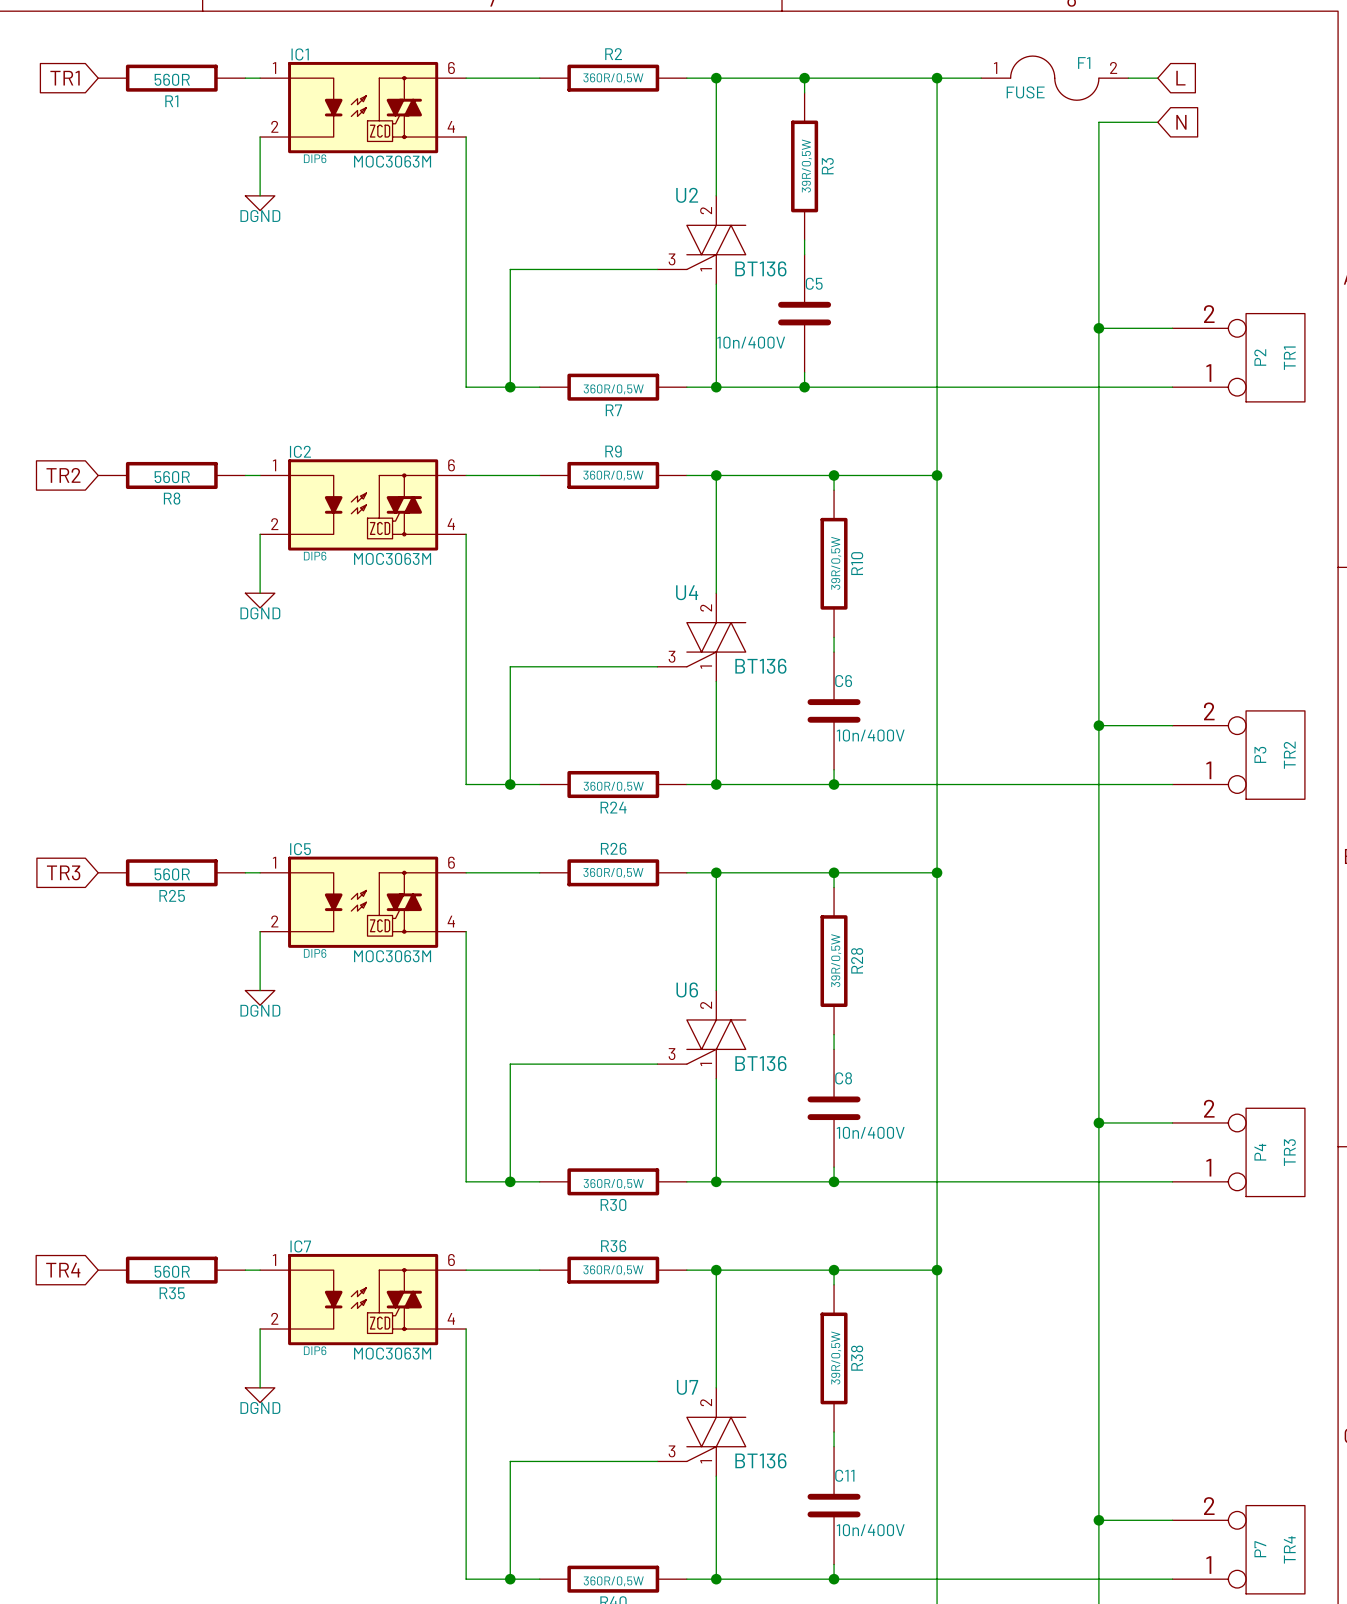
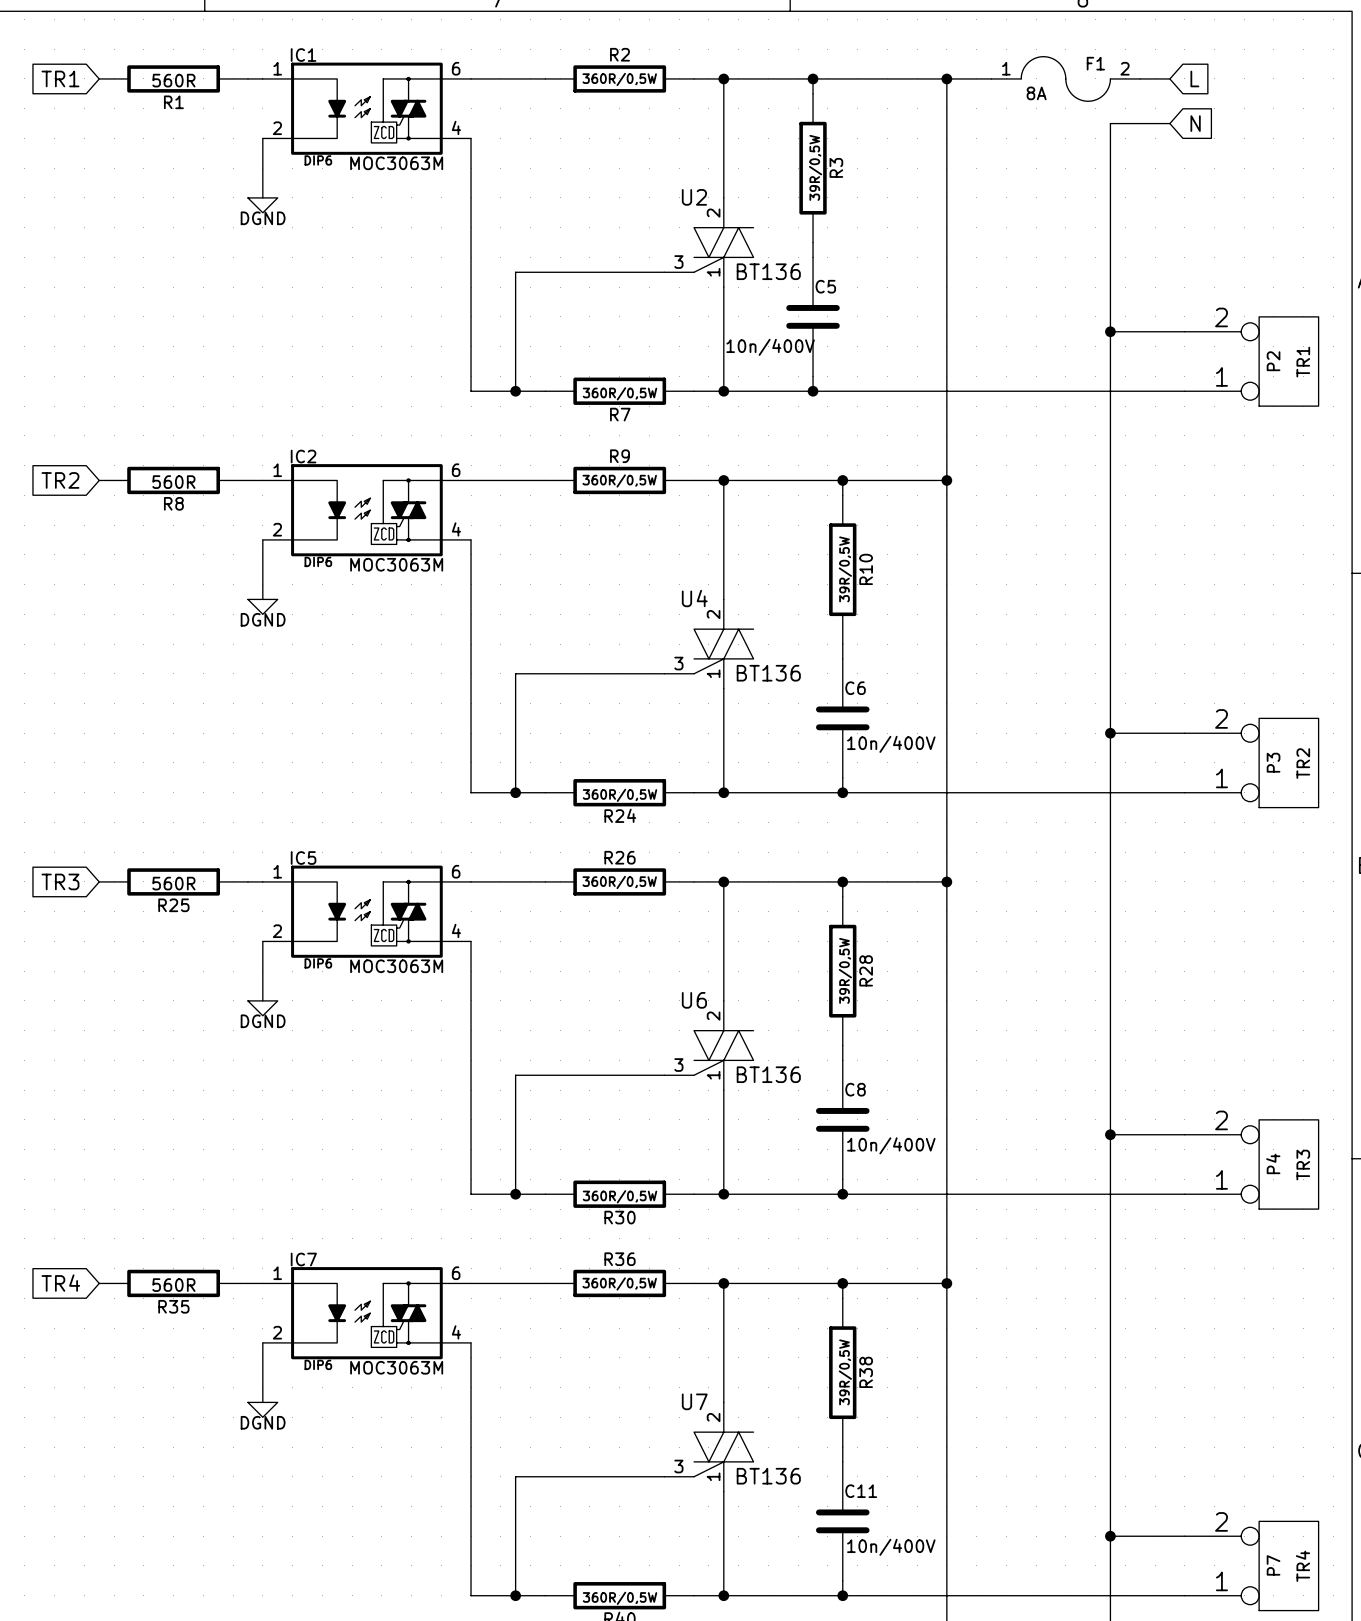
F1 value: FUSE (1025, 92) -> 8A (1036, 93)

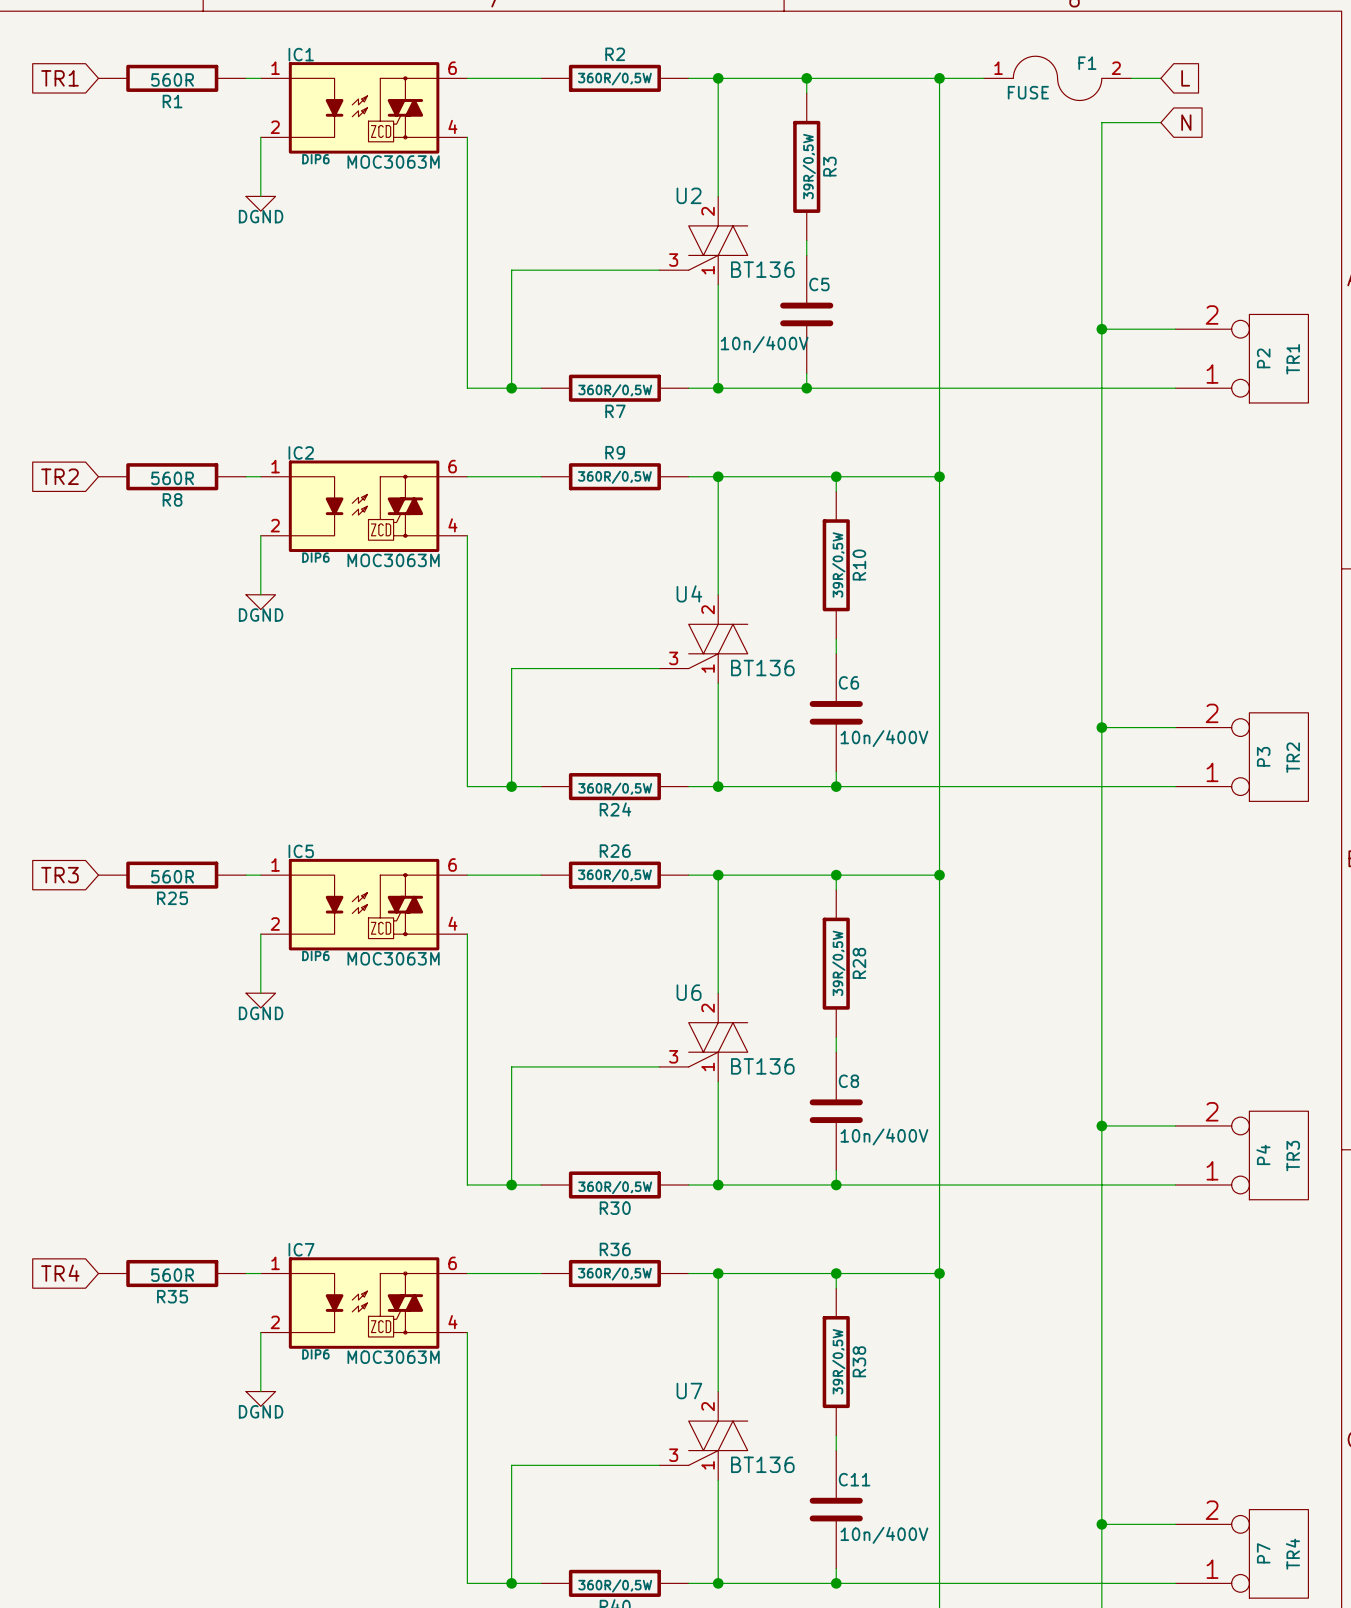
F1 value: 8A (1036, 93) -> FUSE (1028, 92)

